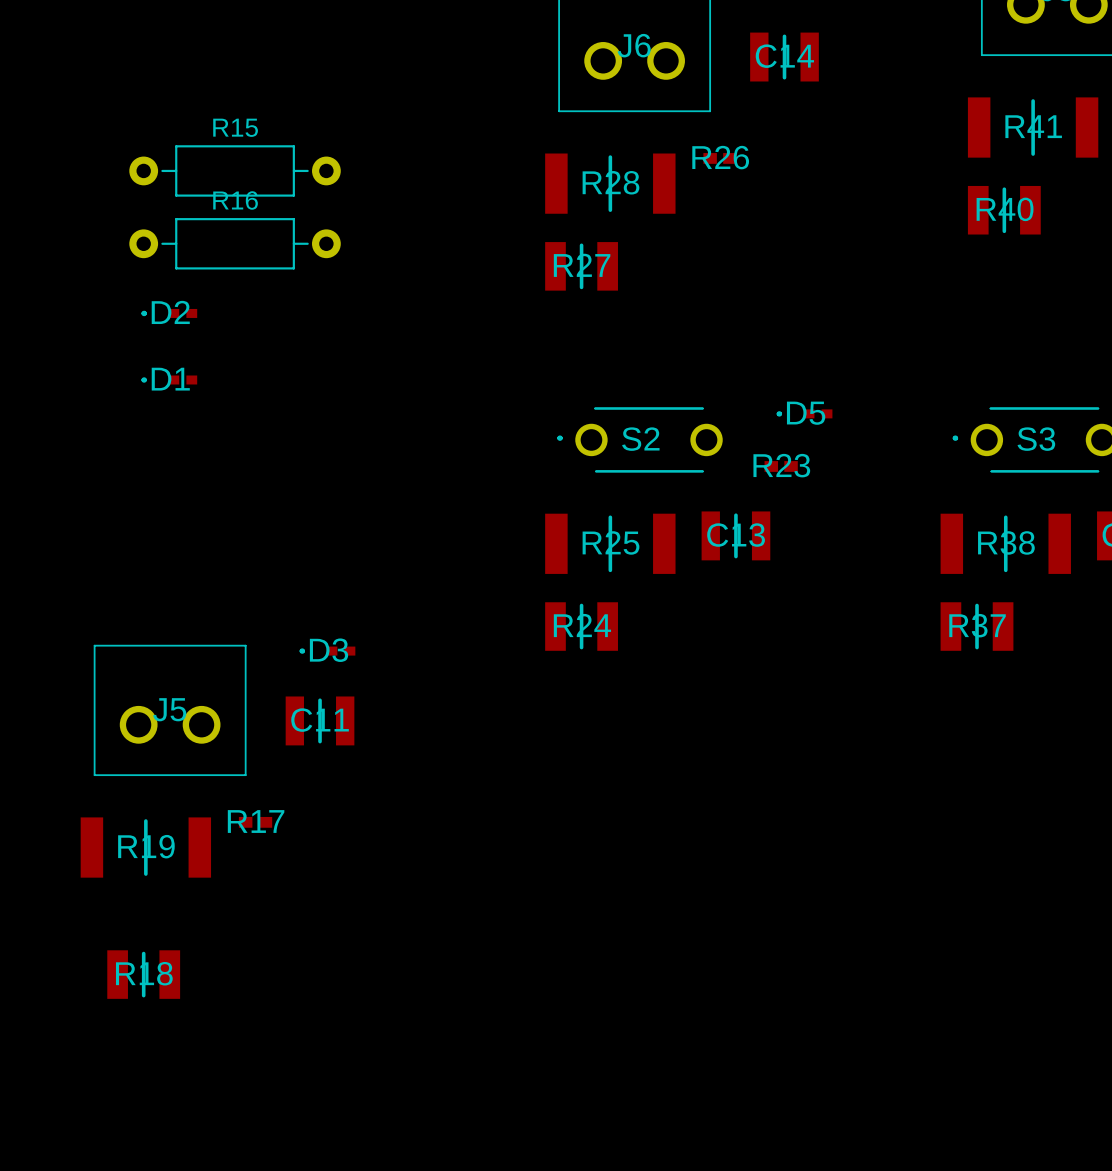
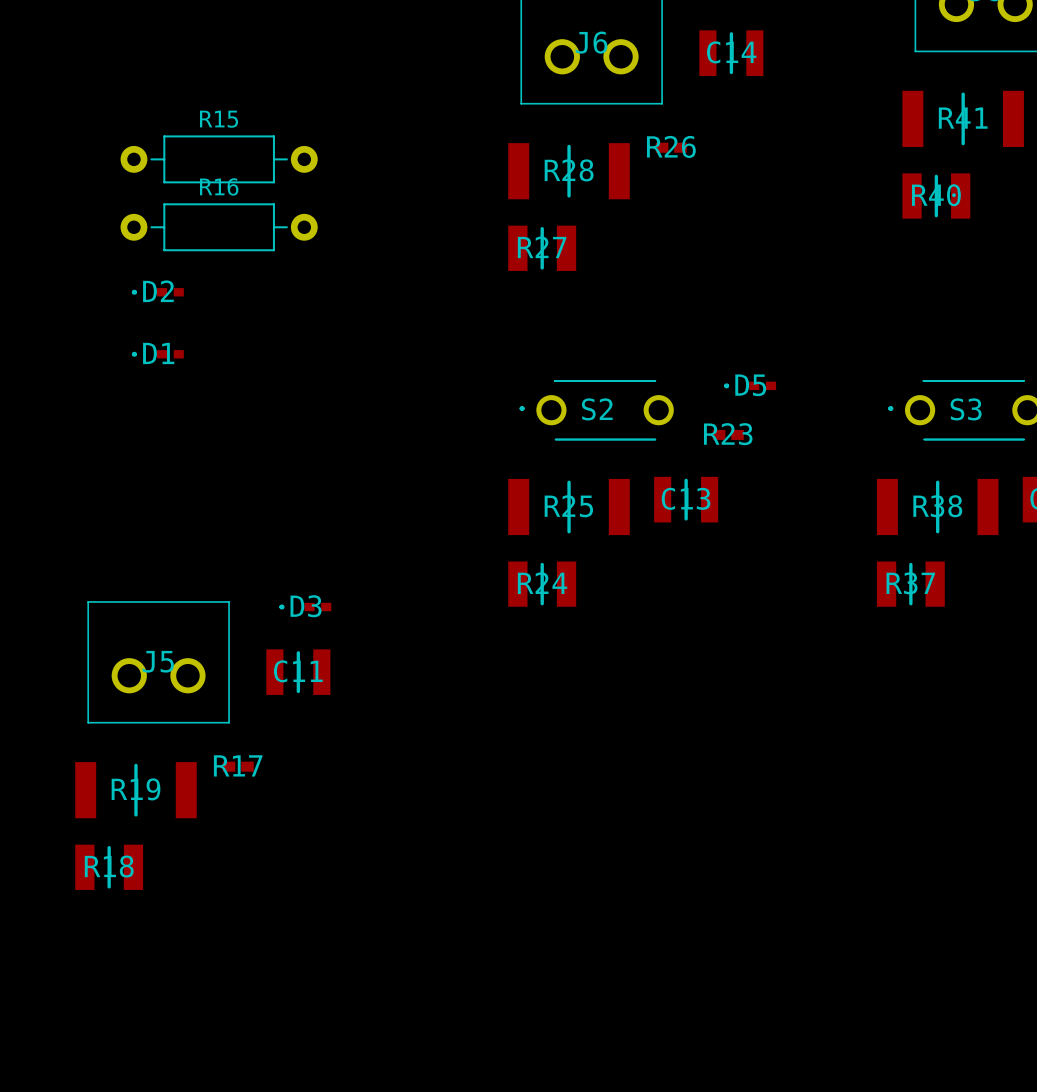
R18 position: (143, 974) -> (109, 867)

